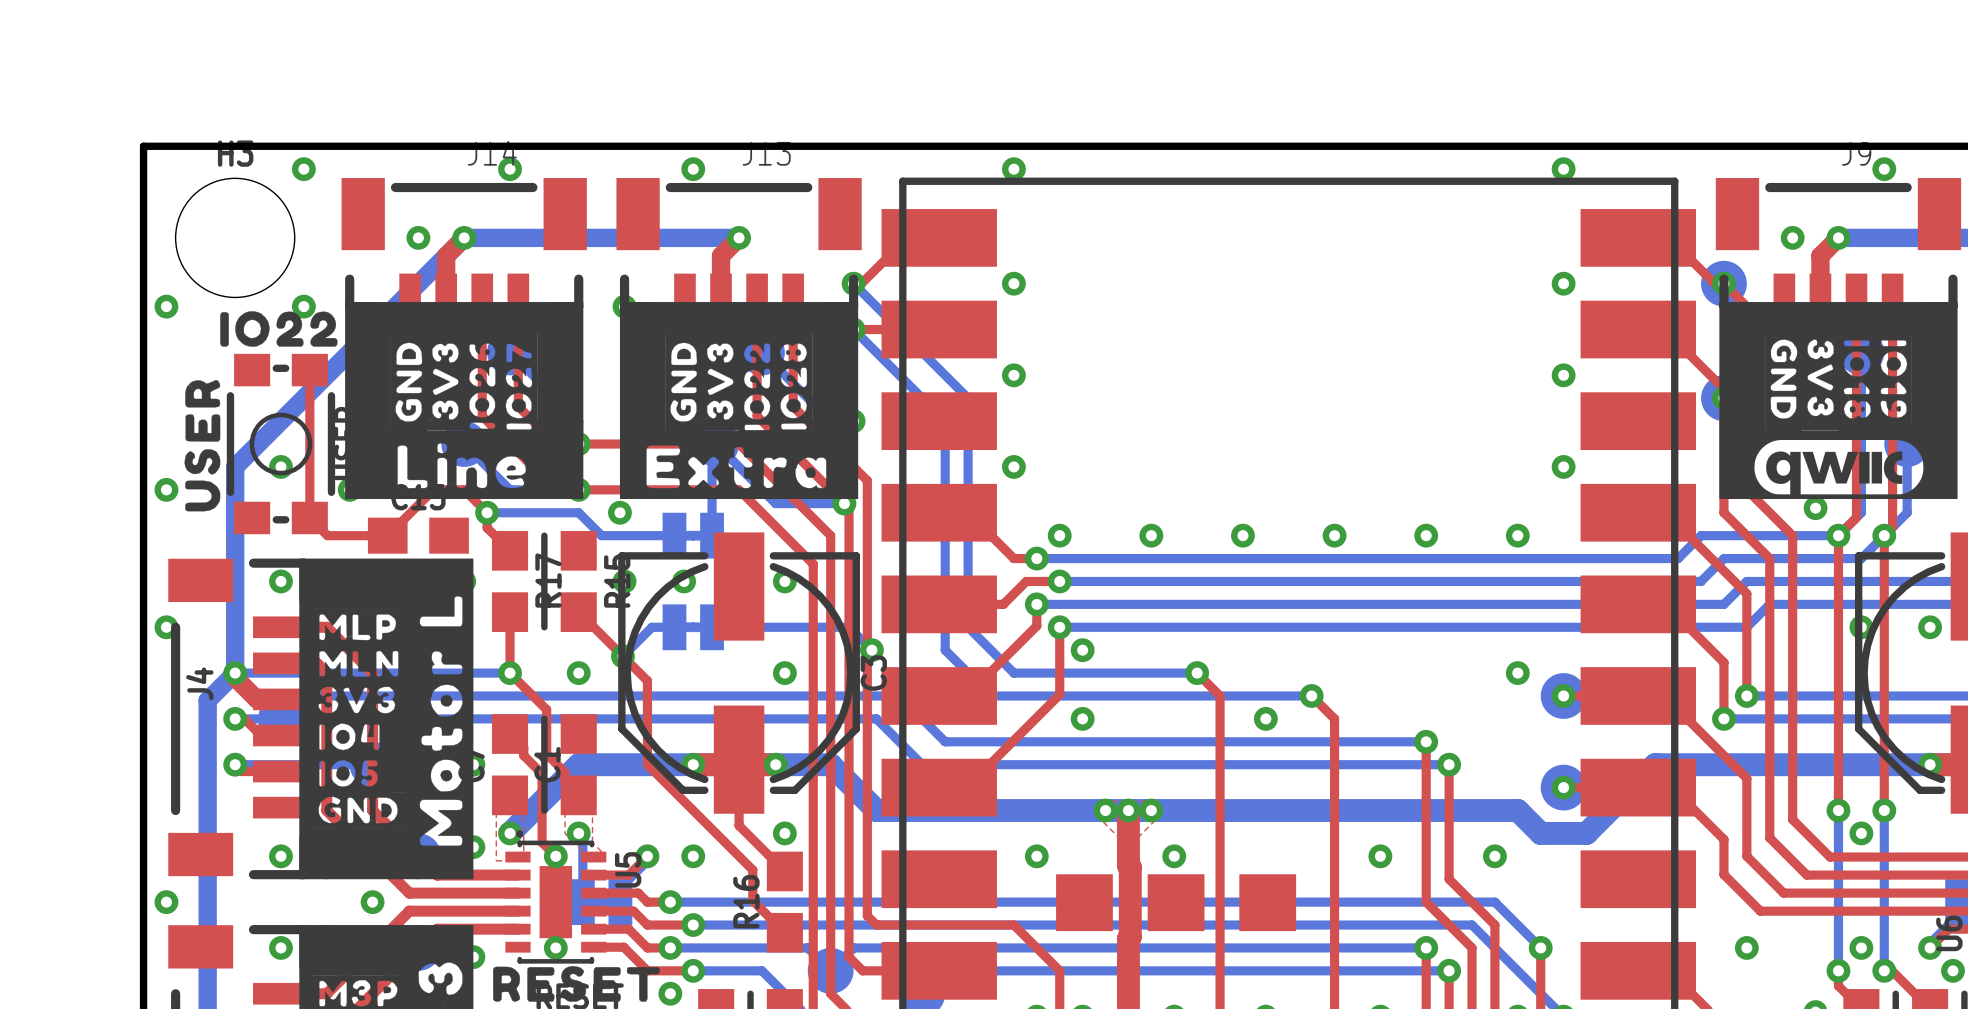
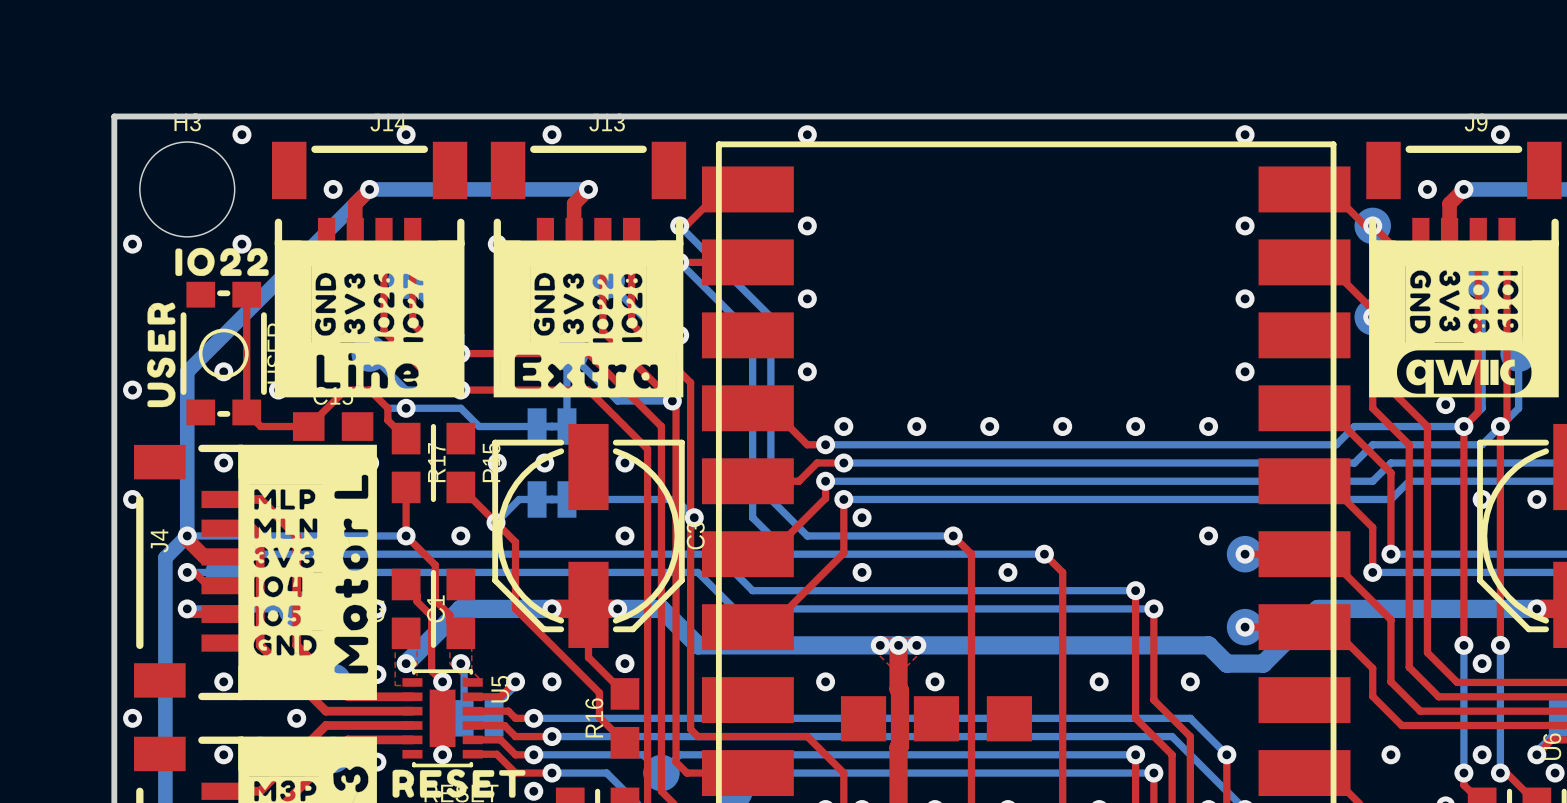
via position: (487, 512) -> (406, 408)
via: (619, 512) -> none

